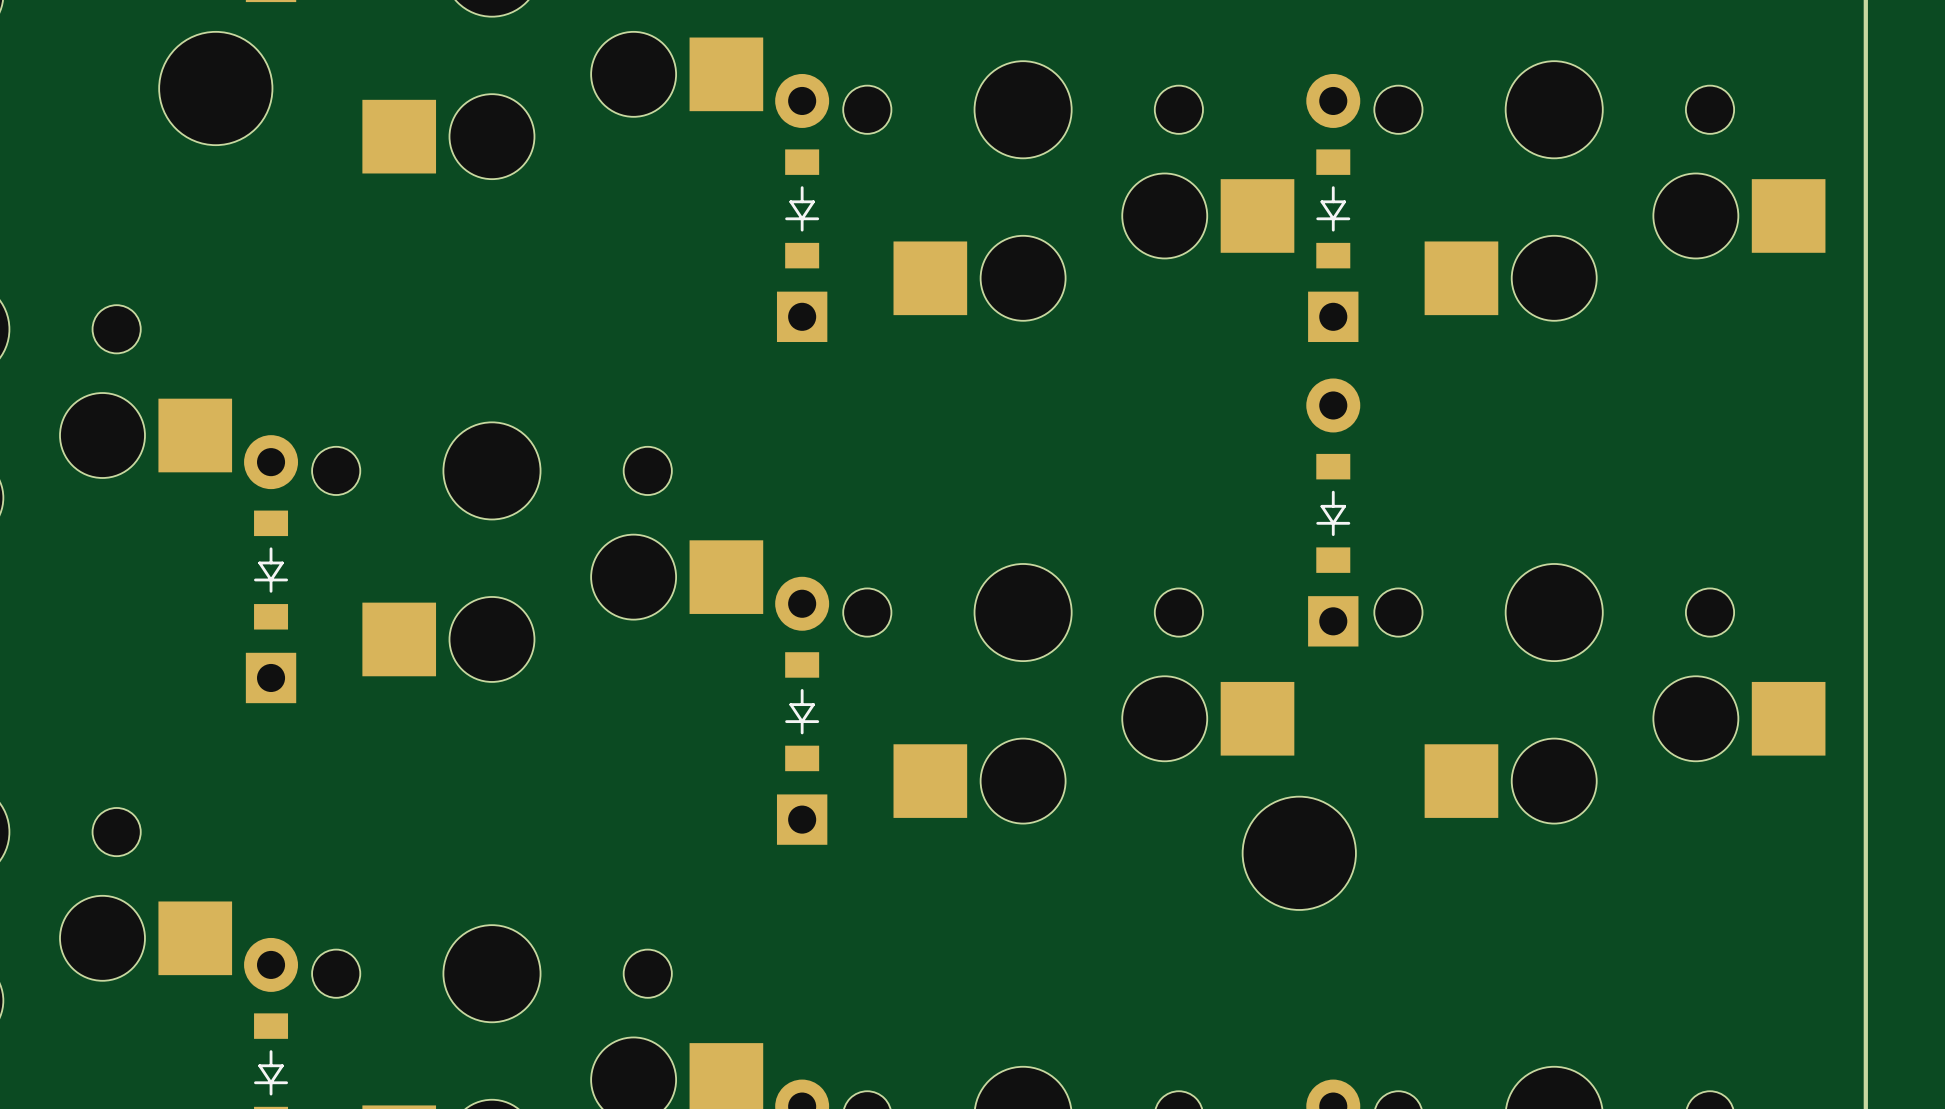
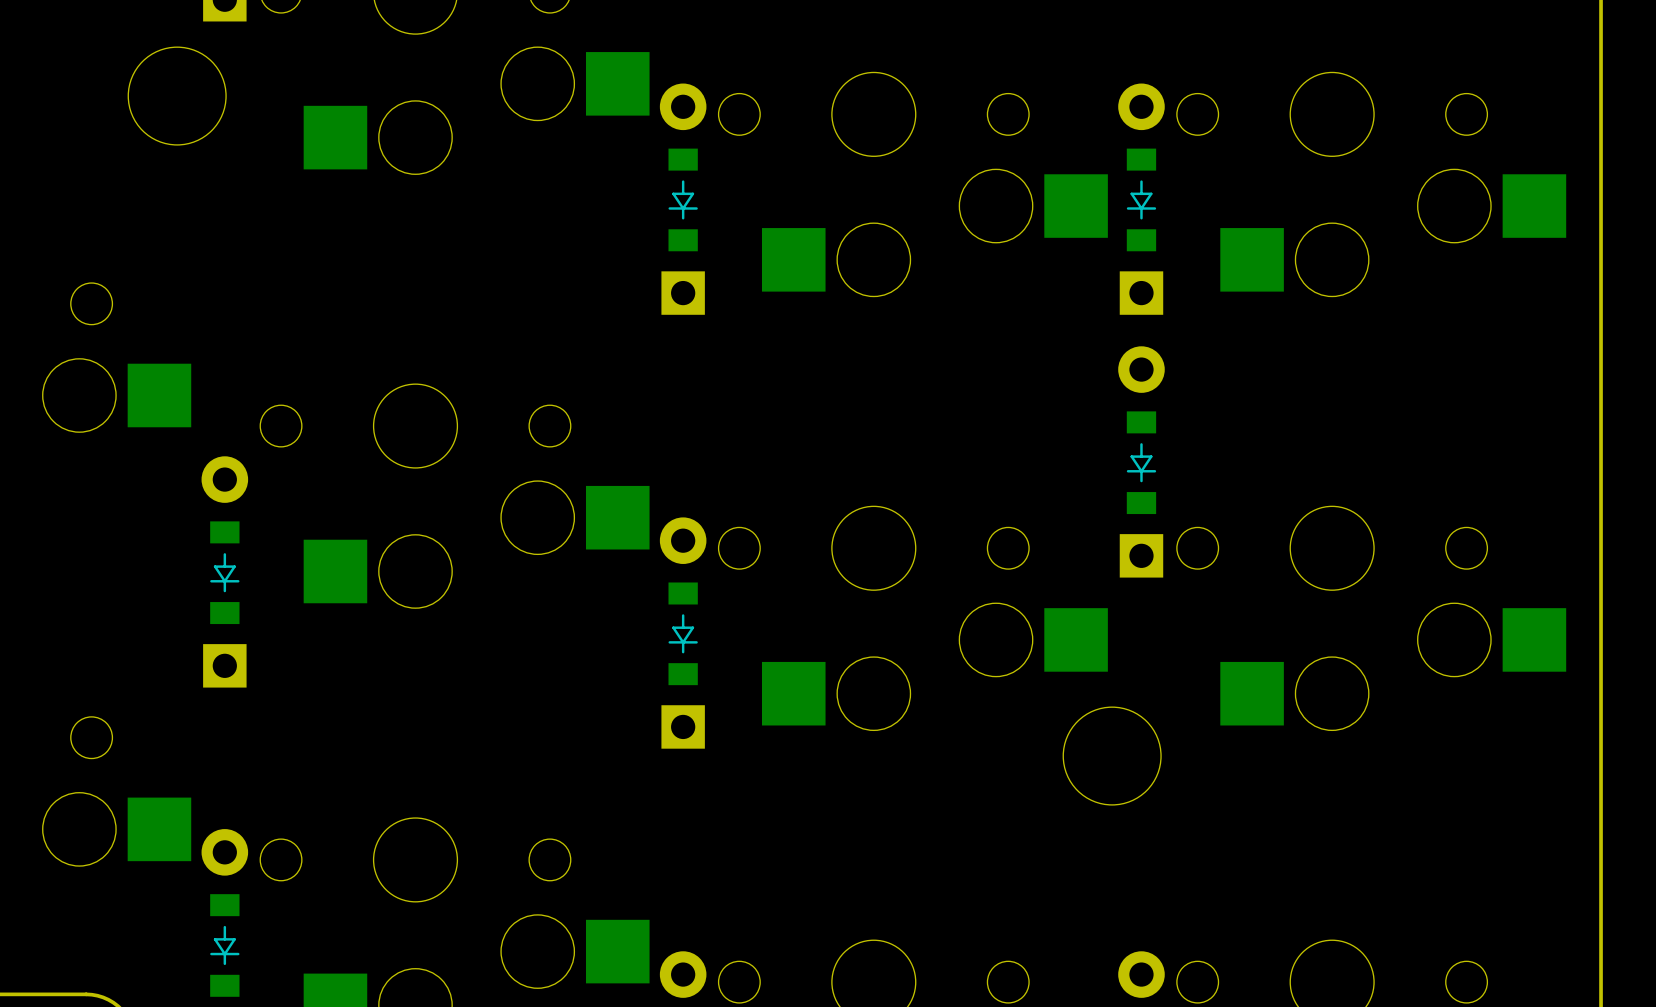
part position: (271, 569) -> (224, 571)

